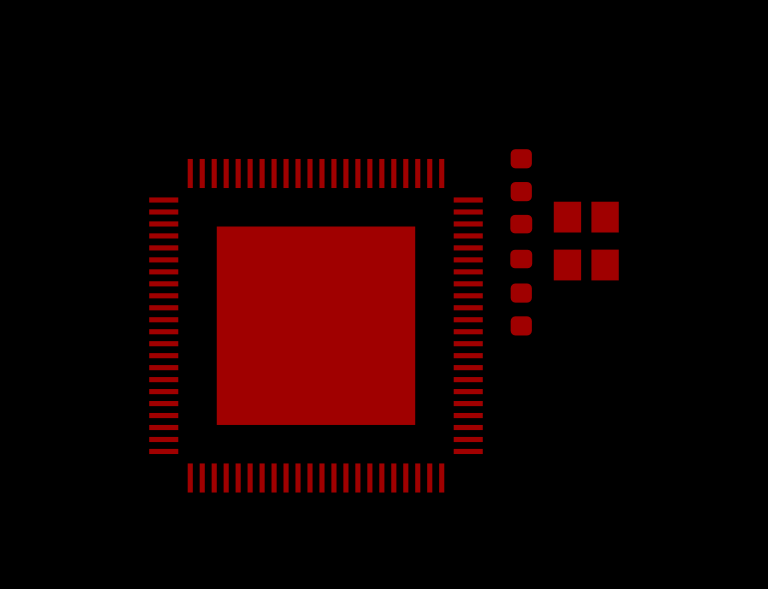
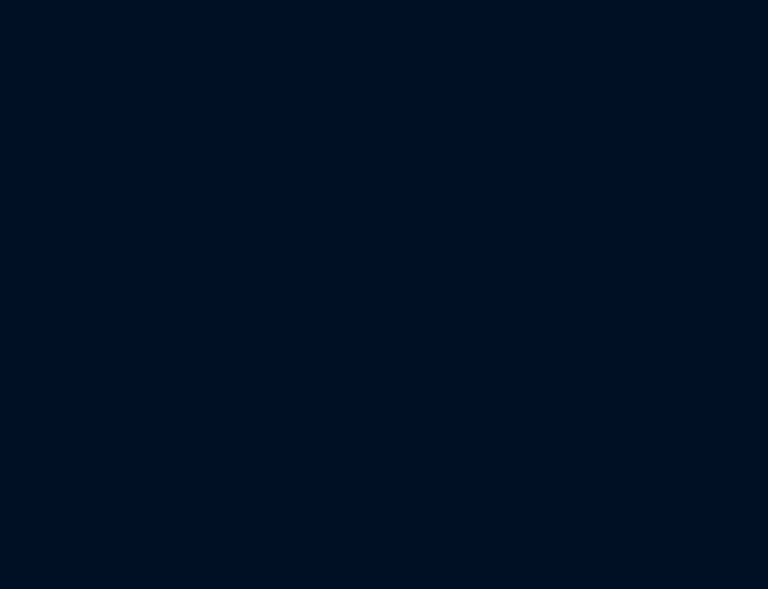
part: (521, 175) -> none
part: (521, 241) -> none
part: (586, 241) -> none
part: (521, 309) -> none
part: (315, 325) -> none

